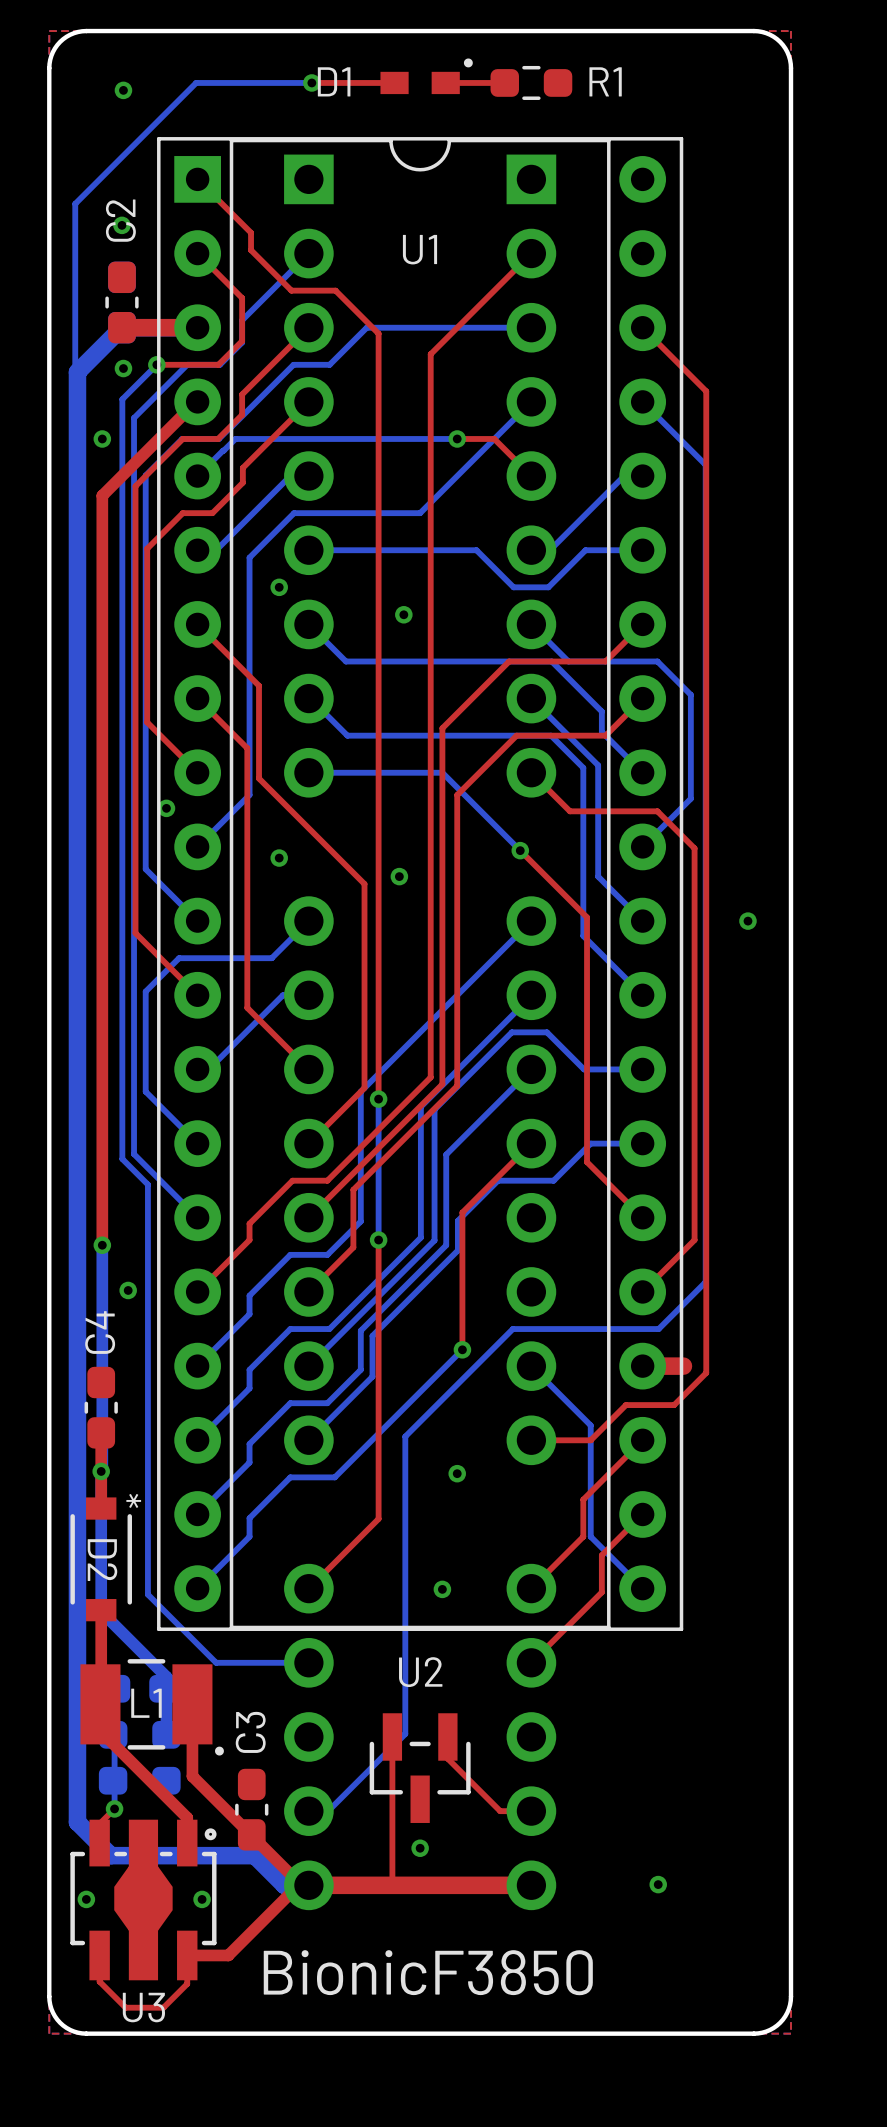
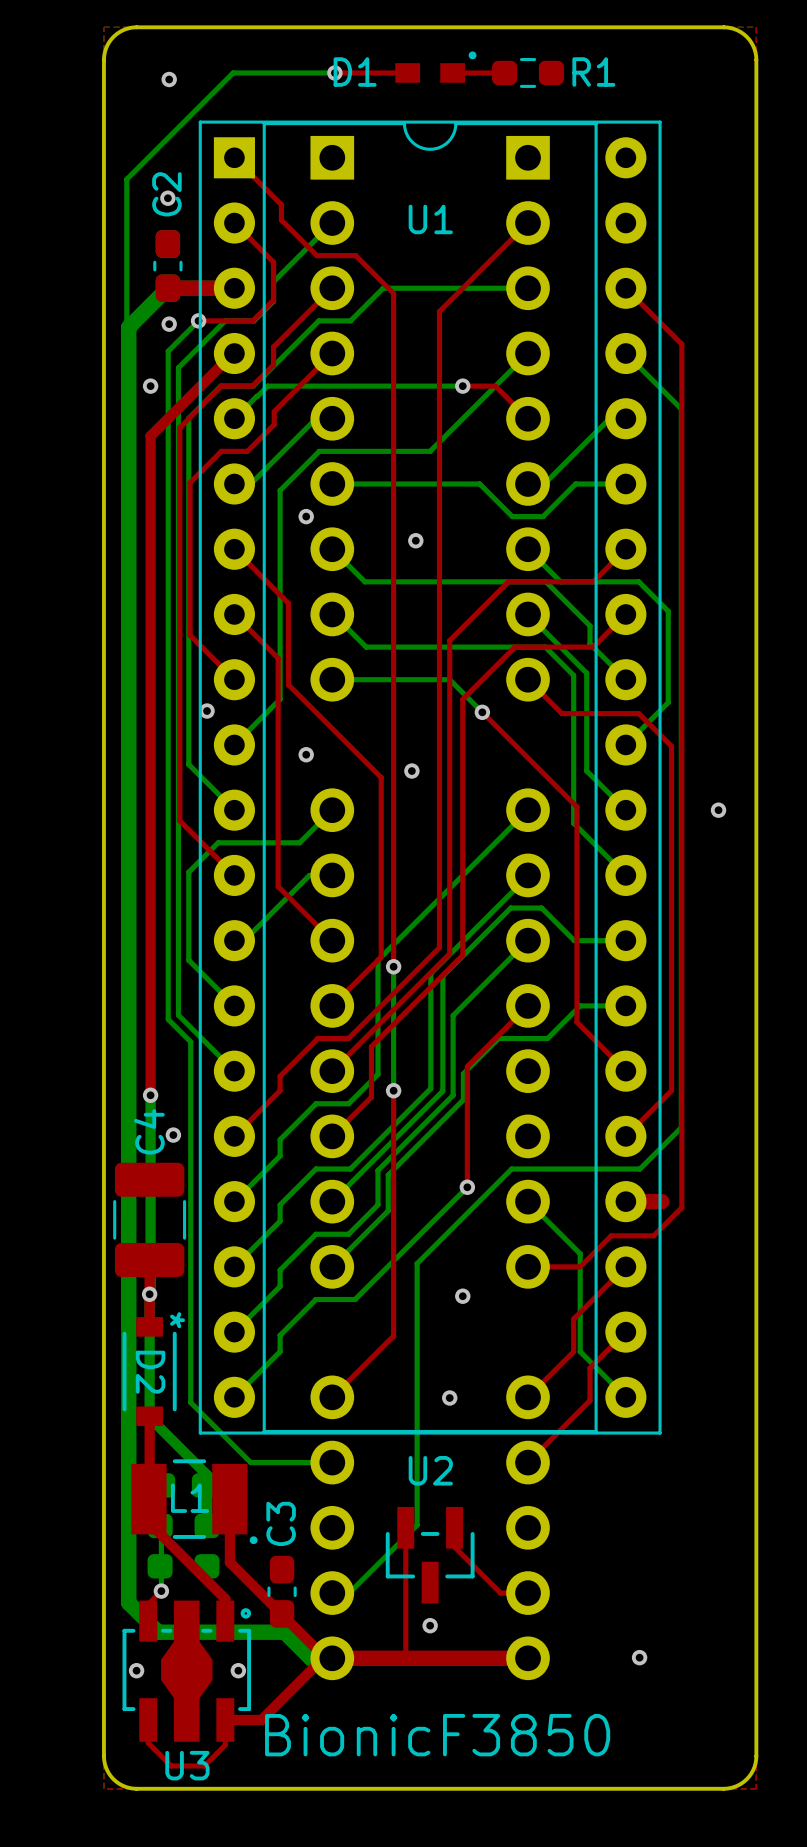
top track: none -> (482, 712) (518, 748)
bottom track: (479, 809) (520, 850) -> none
via position: (520, 850) -> (482, 712)
C4 footprint: [84, 1366, 118, 1449] -> [113, 1162, 187, 1278]

